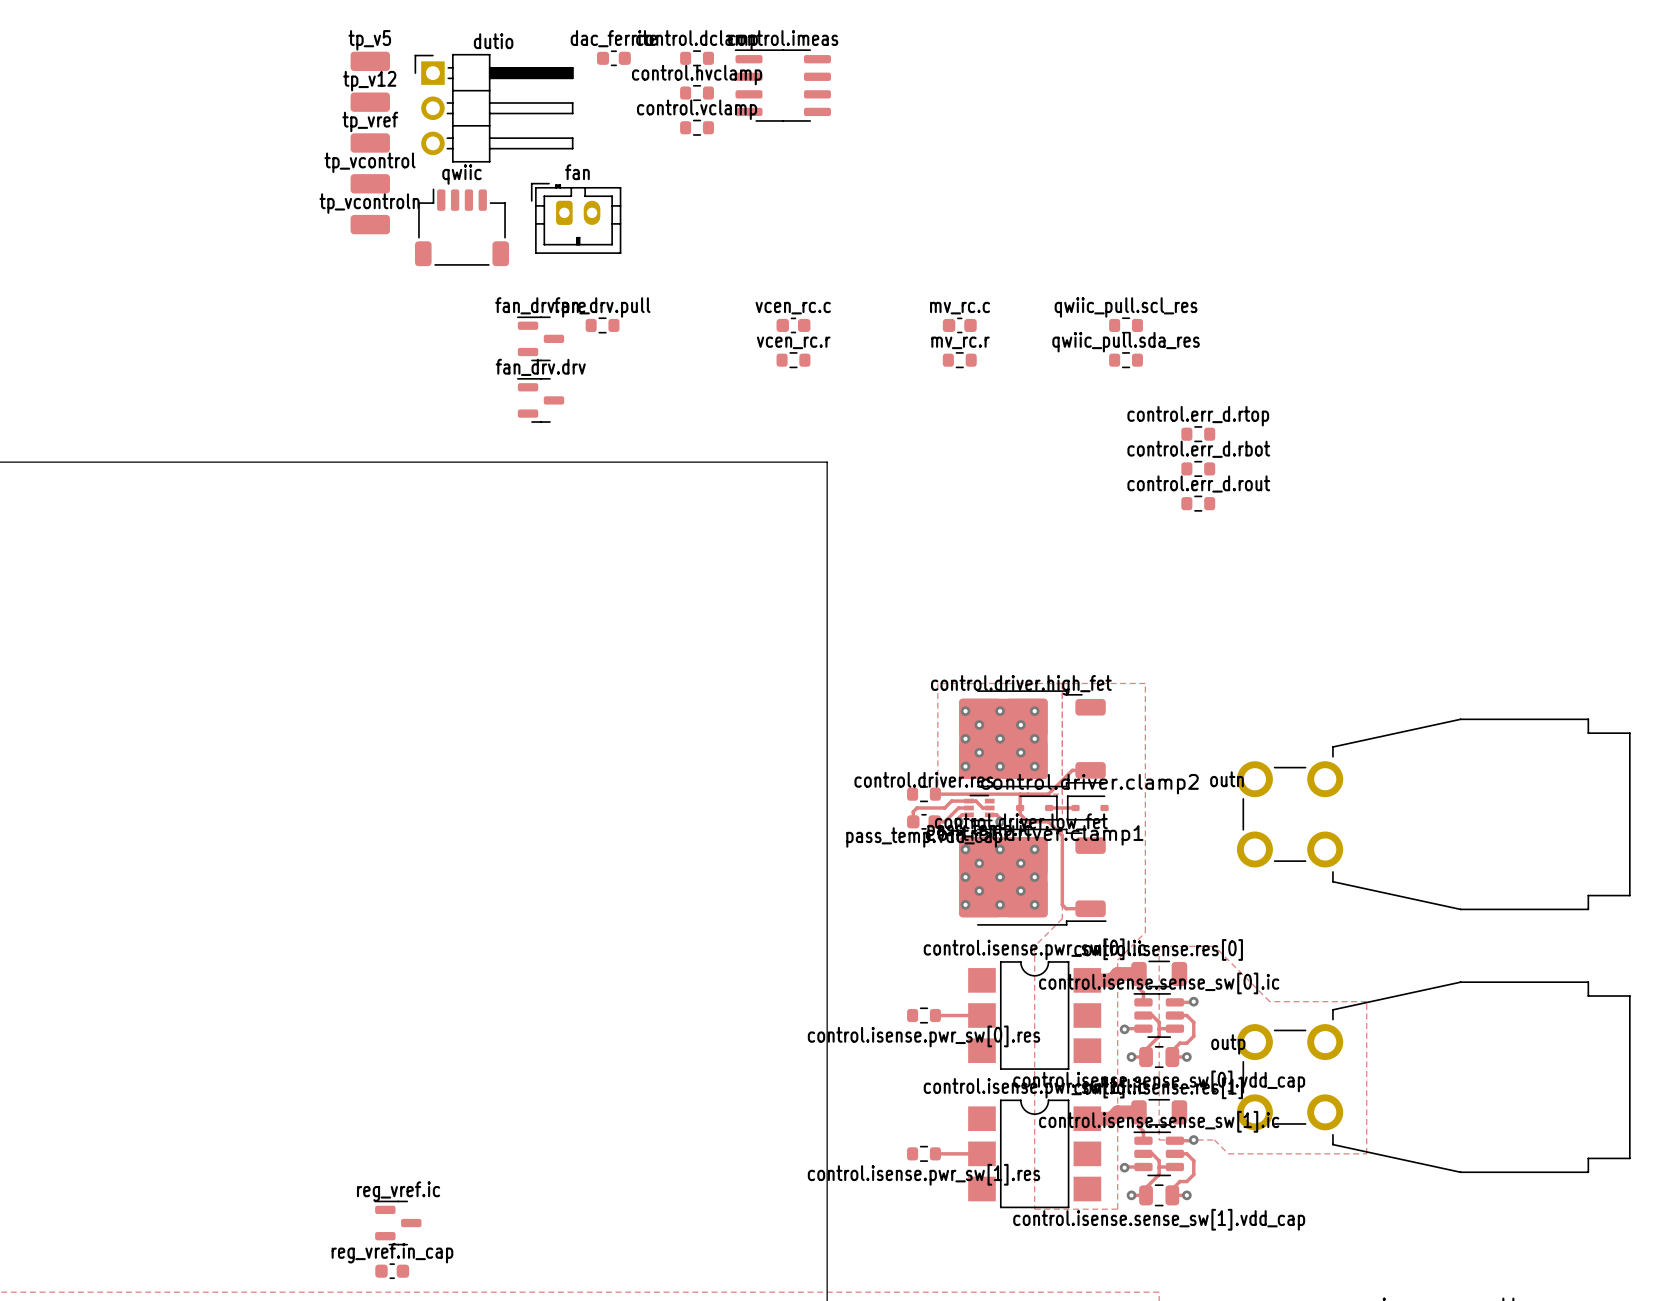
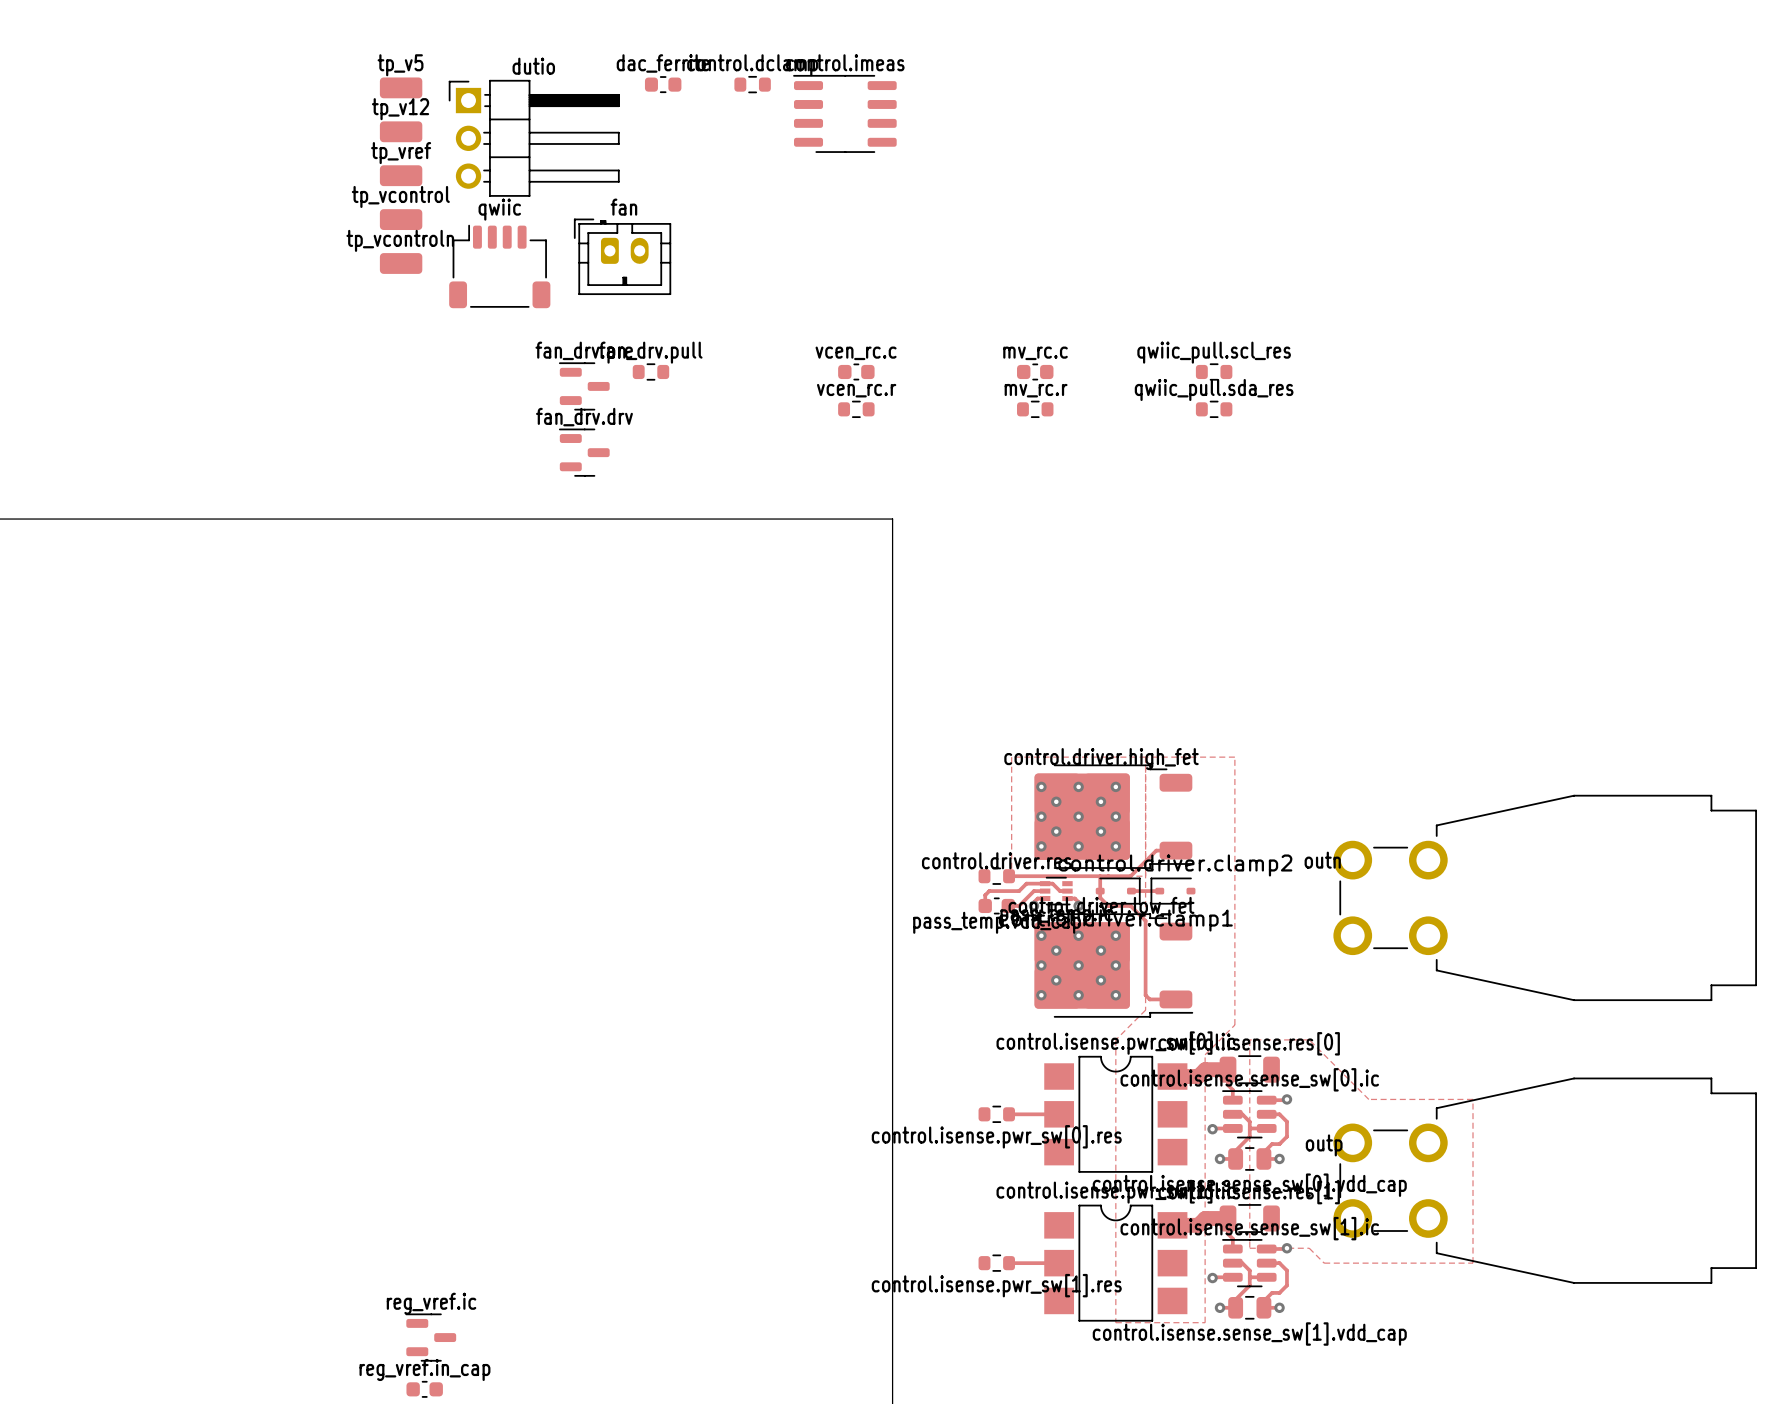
control.hvclamp: (697, 93) -> none
control.vclamp: (697, 127) -> none
control.err_d.rtop: (1198, 434) -> none
control.err_d.rbot: (1198, 468) -> none
control.err_d.rout: (1198, 503) -> none

